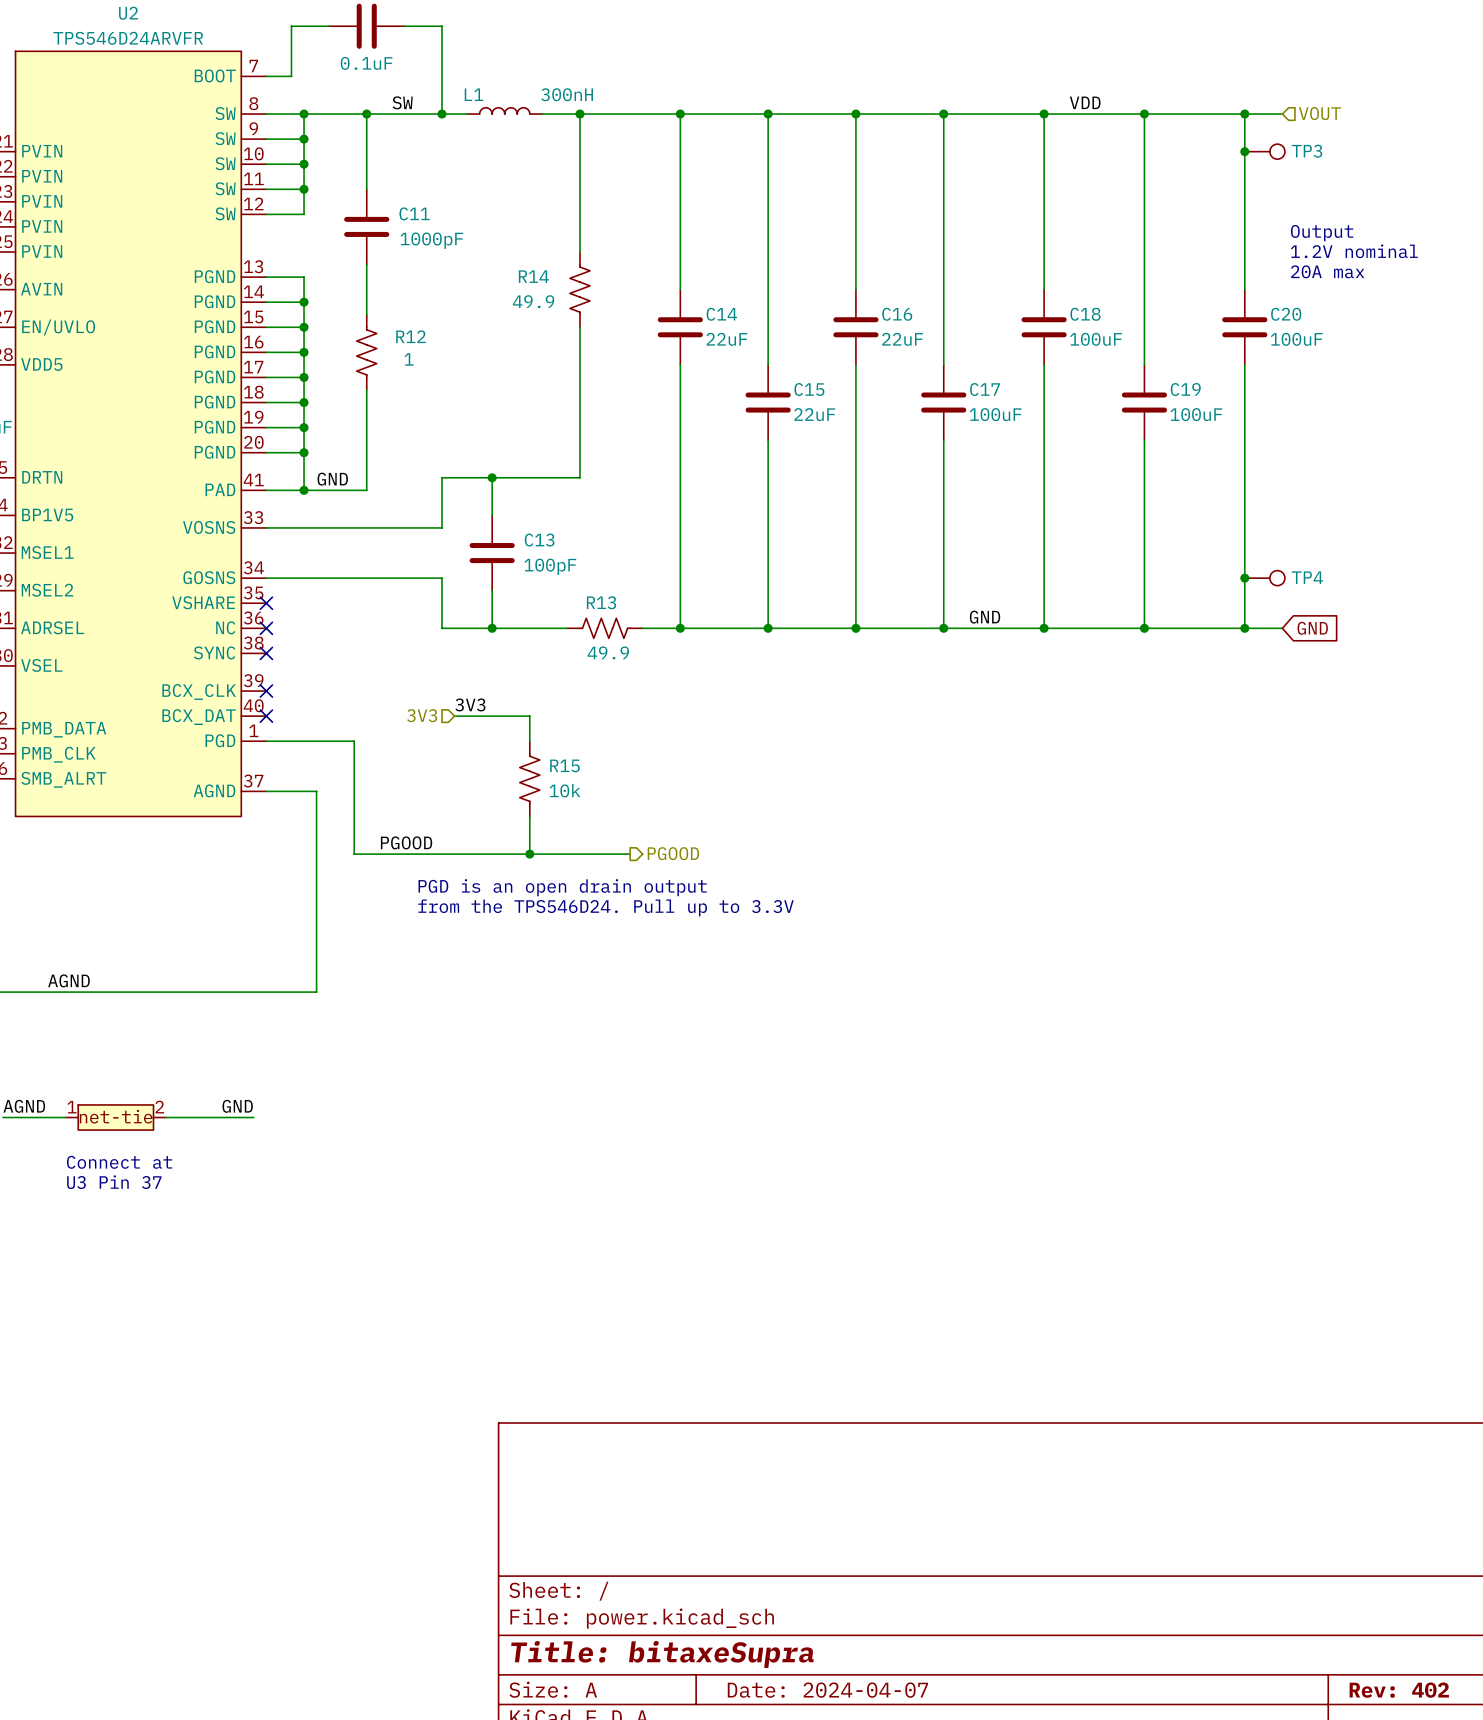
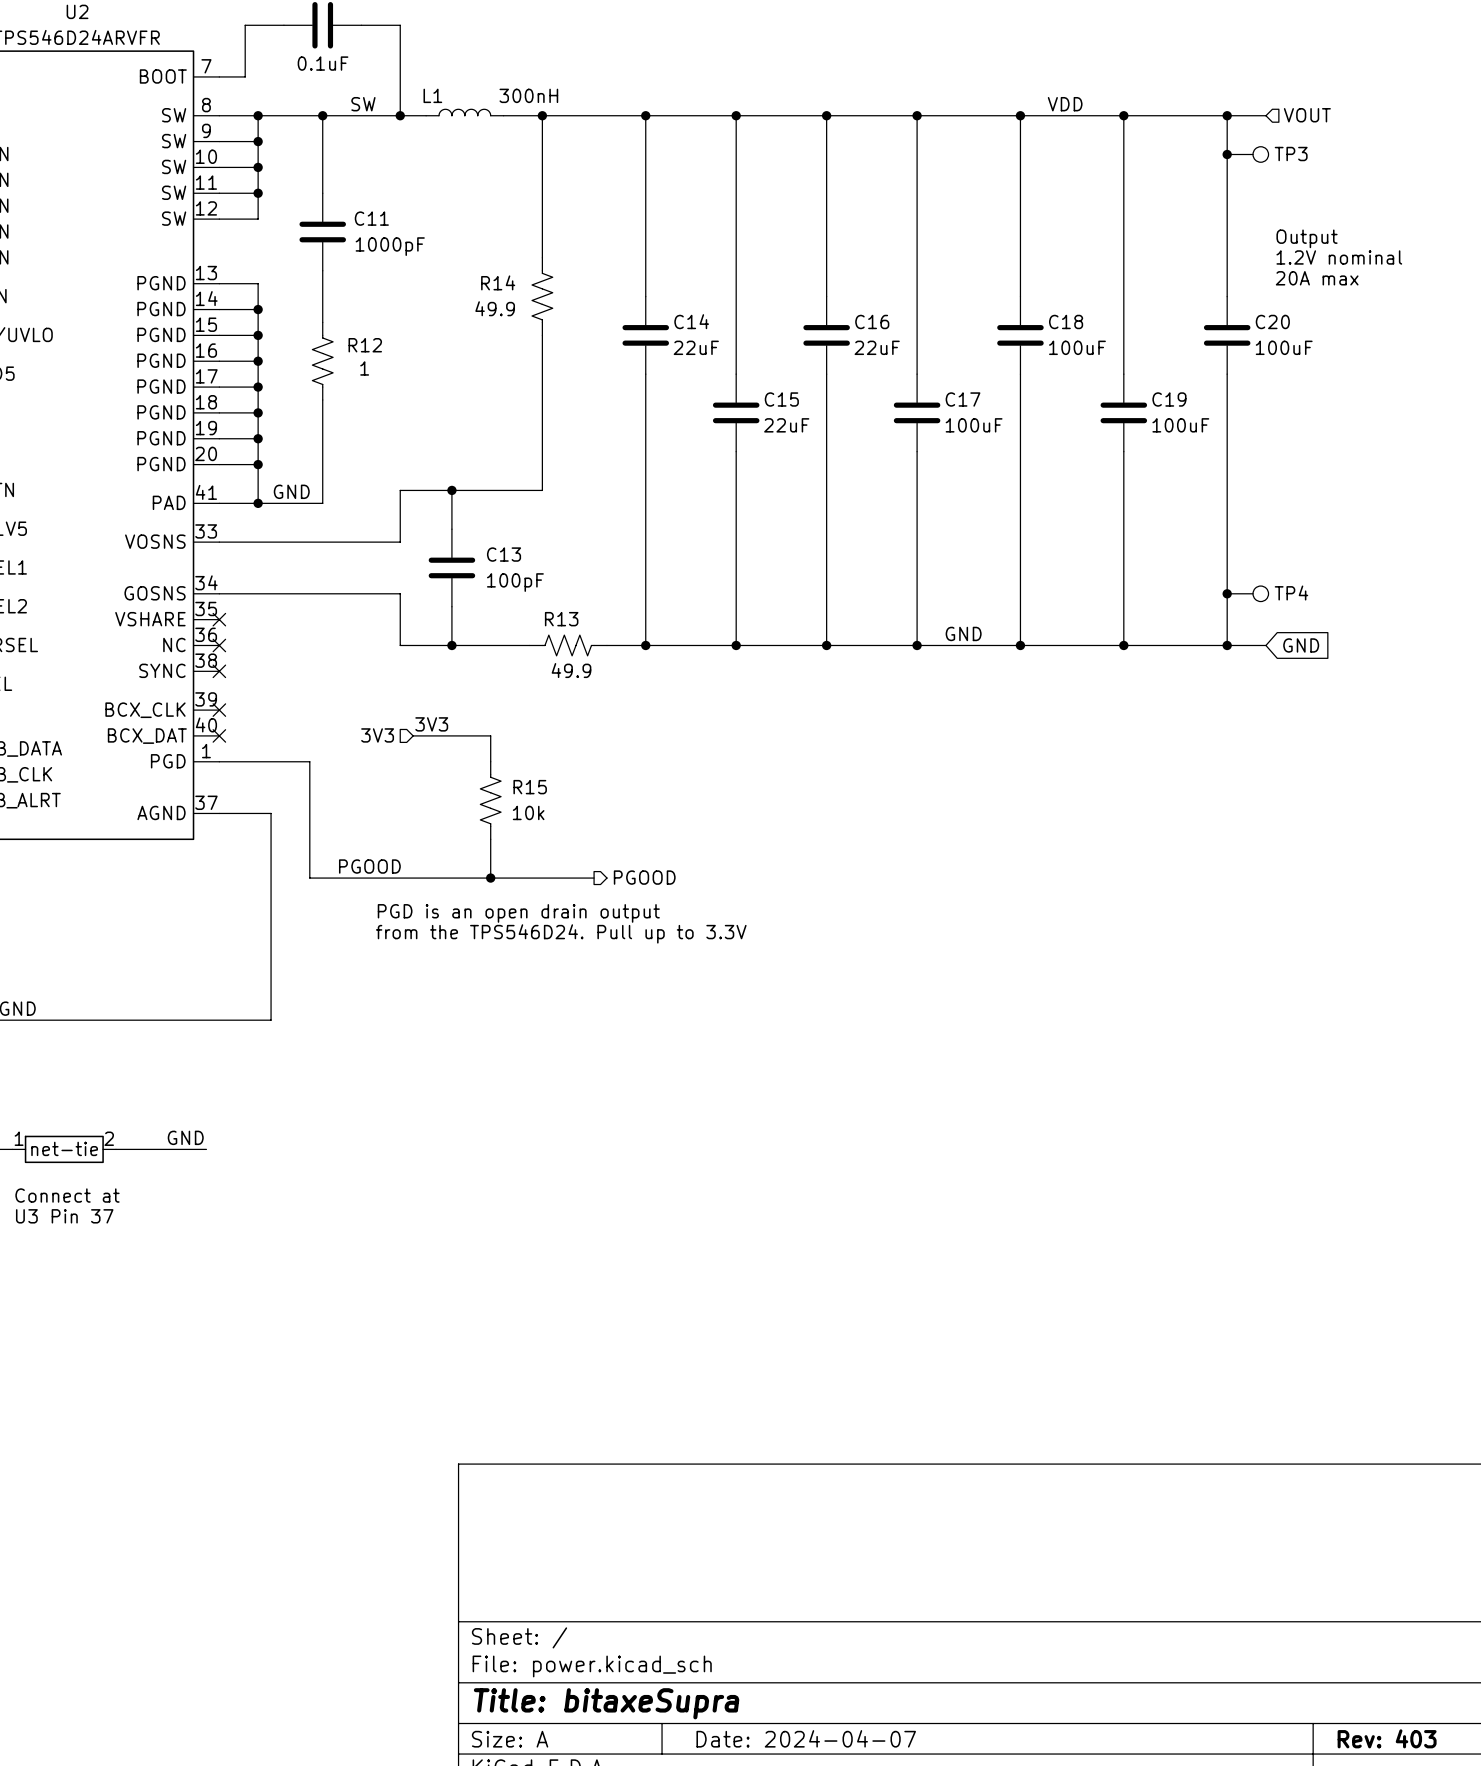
title block: Rev: 402 (1399, 1690) -> Rev: 403 (1387, 1738)

